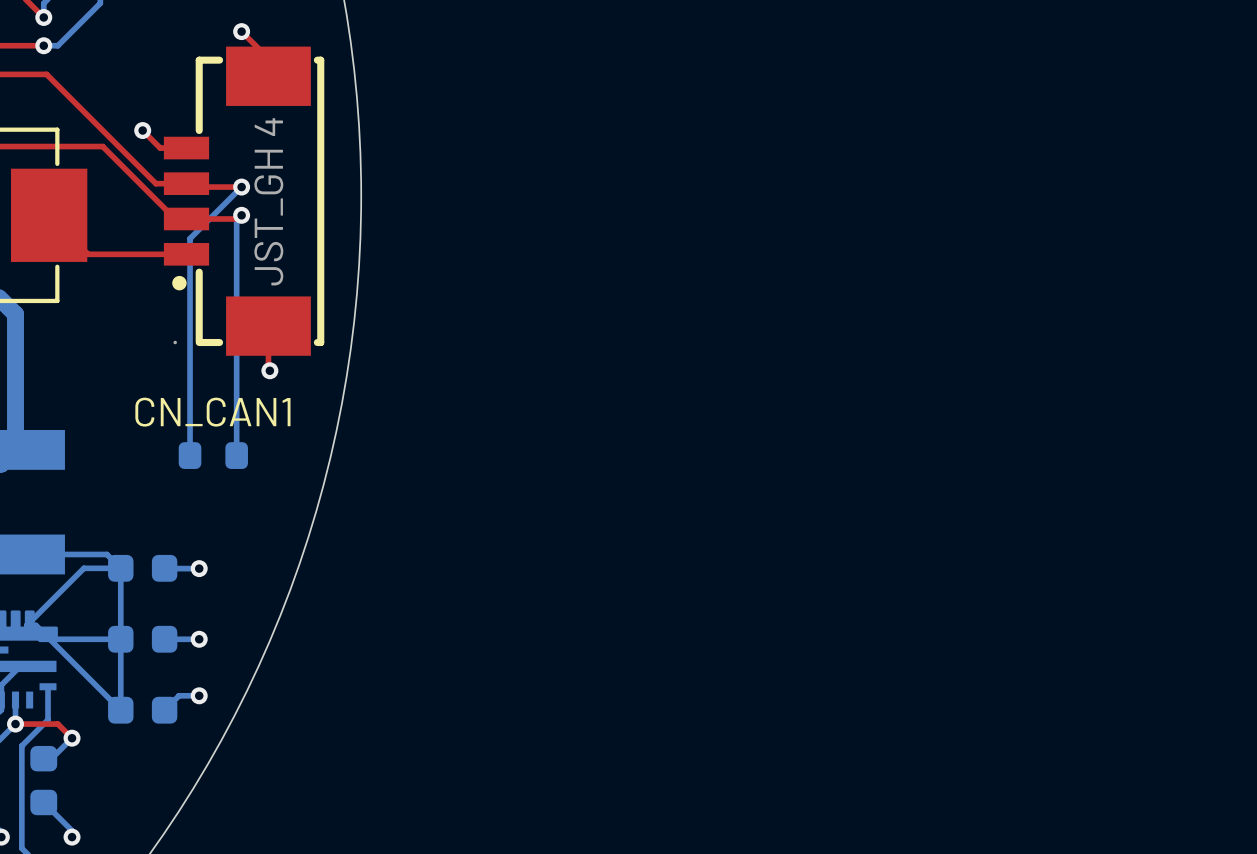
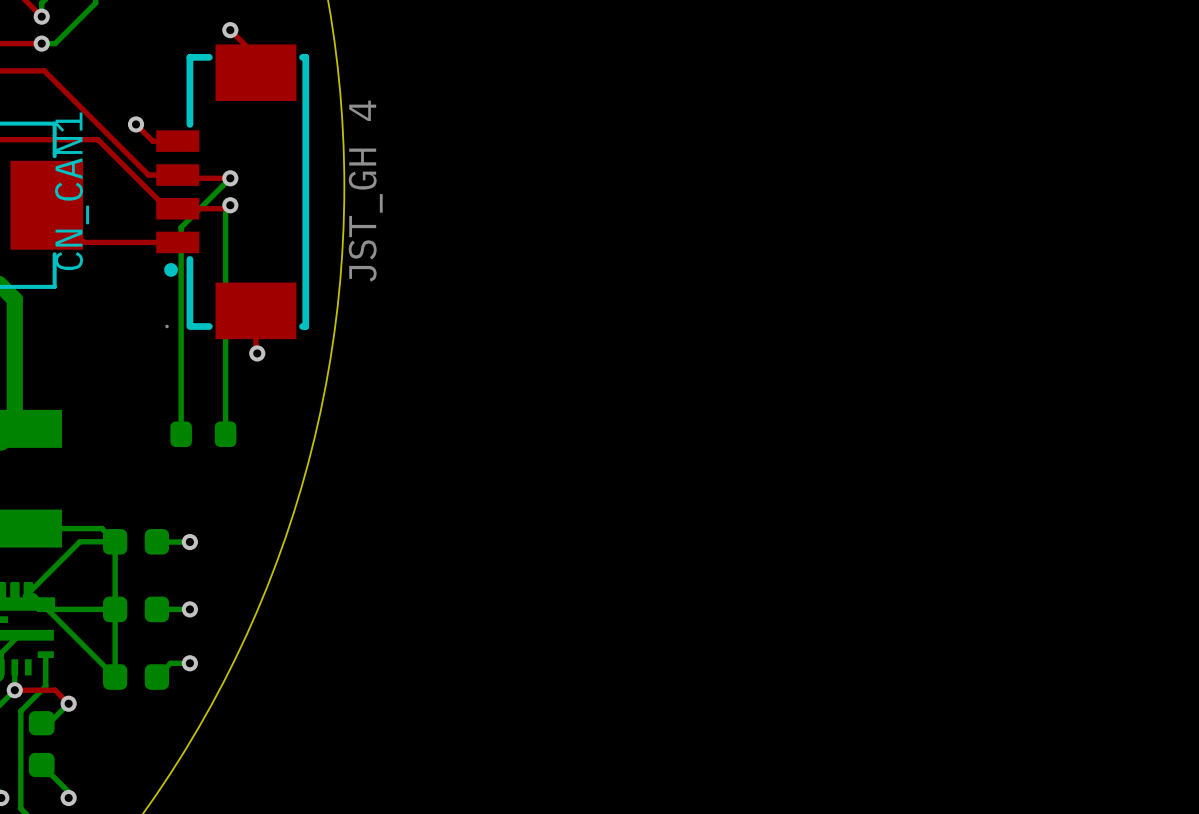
CN_CAN1 value position: JST_GH 4 (268, 201) -> JST_GH 4 (365, 191)
CN_CAN1 name rotation: 0° (212, 412) -> 90° counterclockwise (72, 191)
CN_CAN1 name position: CN_CAN1 (212, 412) -> CN_CAN1 (72, 191)

